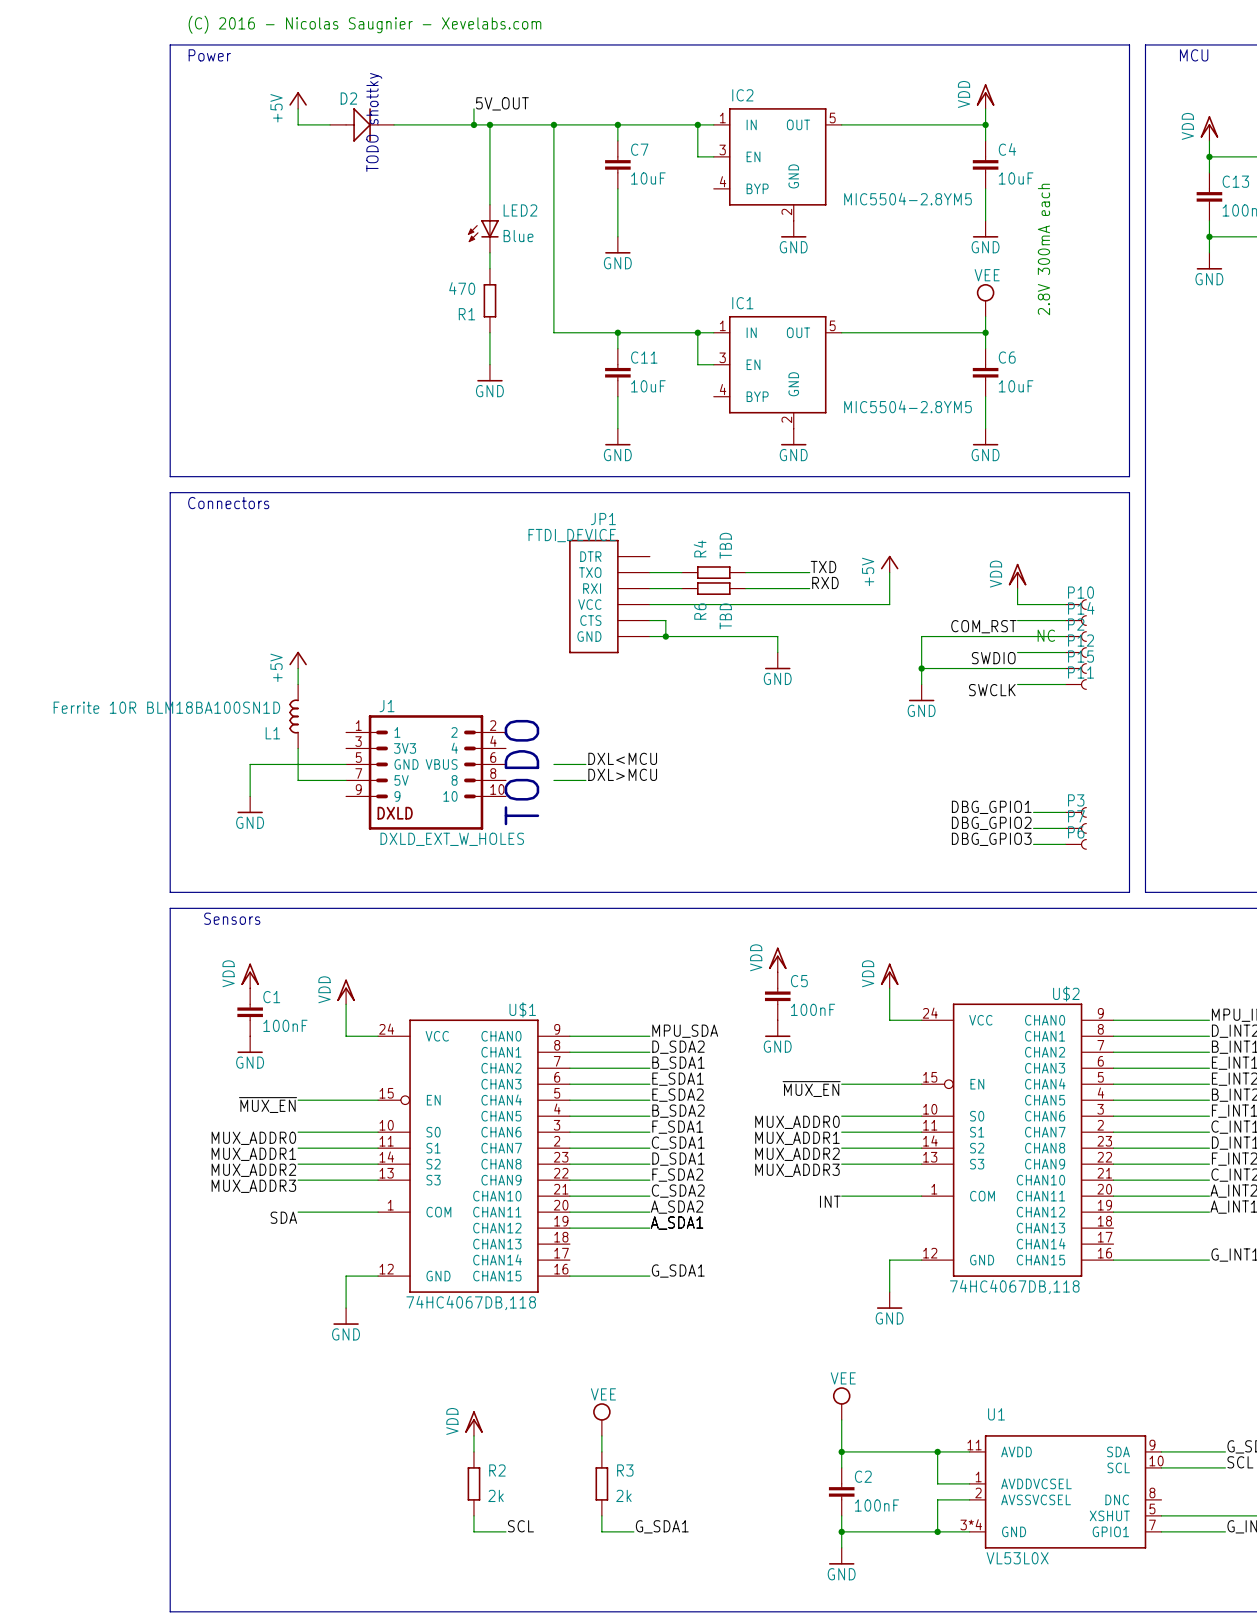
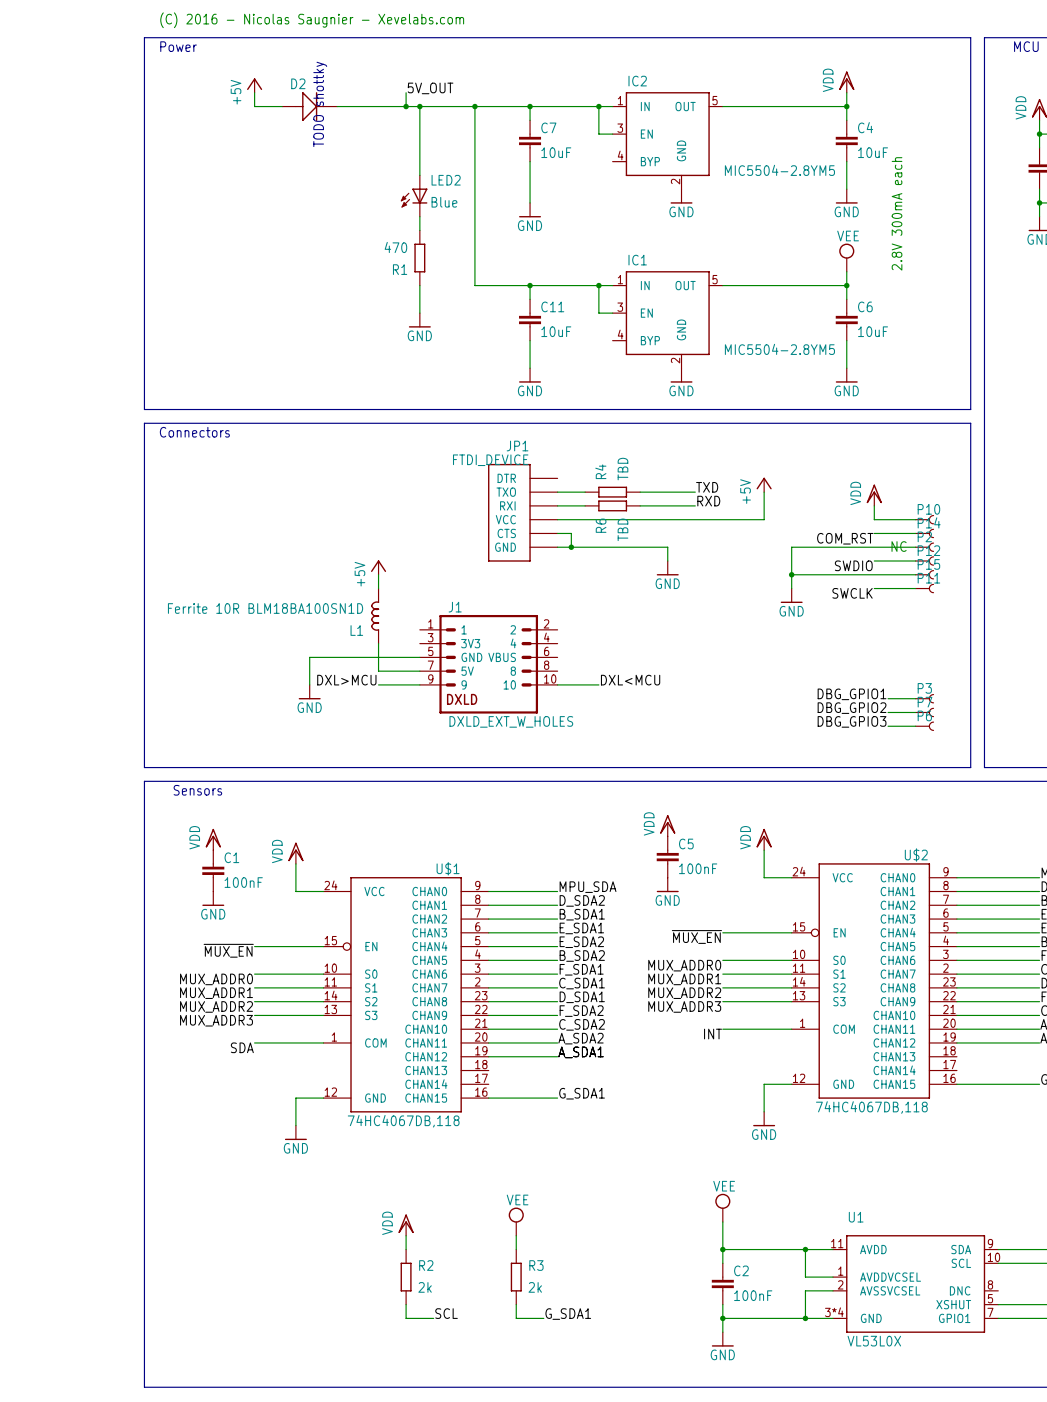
power symbol position: +5V (298, 660) -> +5V (378, 567)
wire: (298, 668) (298, 684) -> (378, 574) (378, 588)
L1 position: (294, 716) -> (375, 616)
wire: (298, 748) (298, 780) (346, 780) -> (378, 643) (378, 671) (419, 671)
label position: DXL<MCU (622, 758) -> DXL<MCU (630, 680)
wire: (346, 764) (250, 764) (250, 796) -> none
wire: none -> (419, 657) (309, 657) (309, 684)
wire: (553, 764) (585, 764) -> none
J1 position: (426, 772) -> (488, 664)
text: TODO (521, 772) -> none
label position: DXL>MCU (622, 774) -> DXL>MCU (346, 680)
wire: (553, 780) (585, 780) -> none
wire: none -> (557, 684) (598, 684)
power symbol position: GND (250, 804) -> GND (309, 692)

